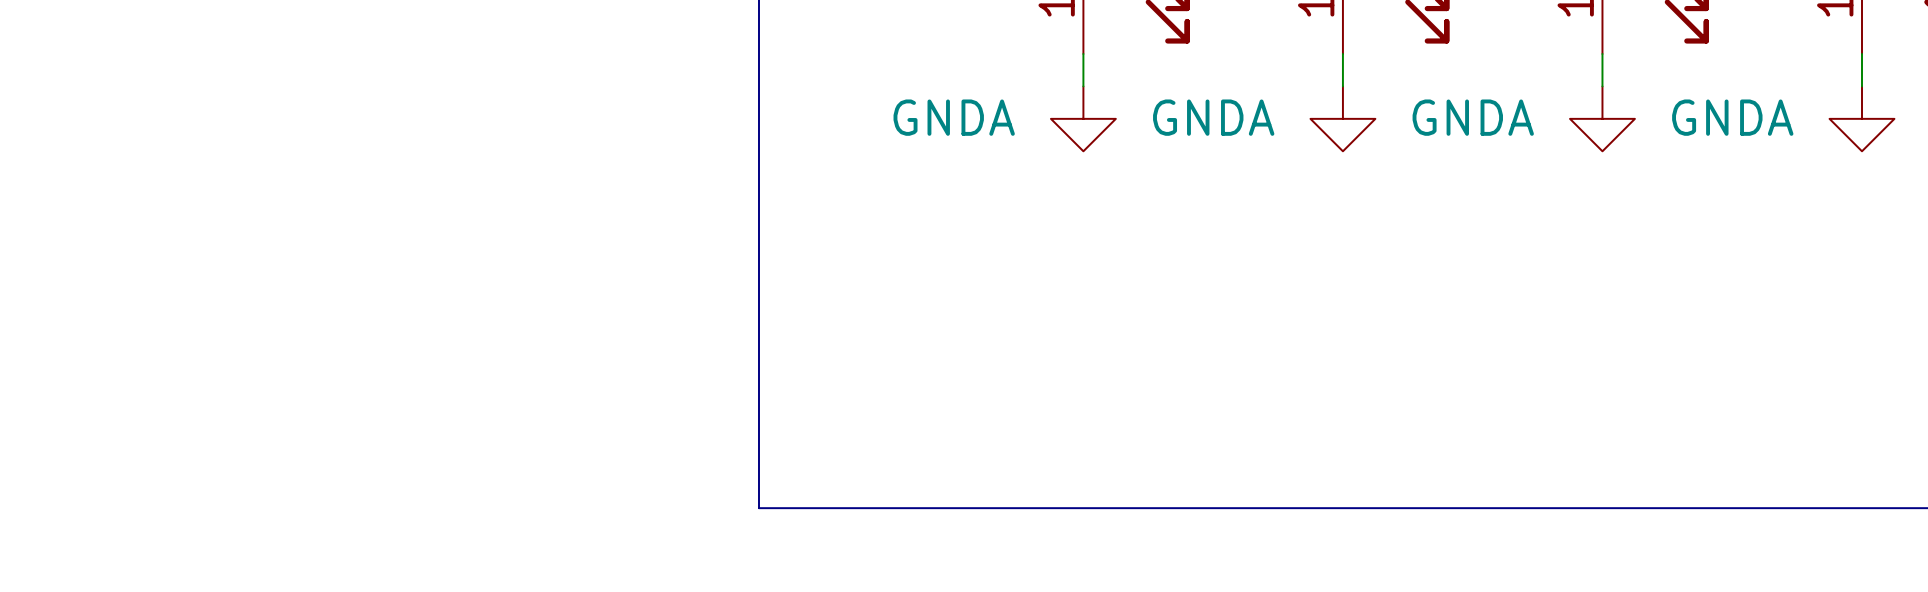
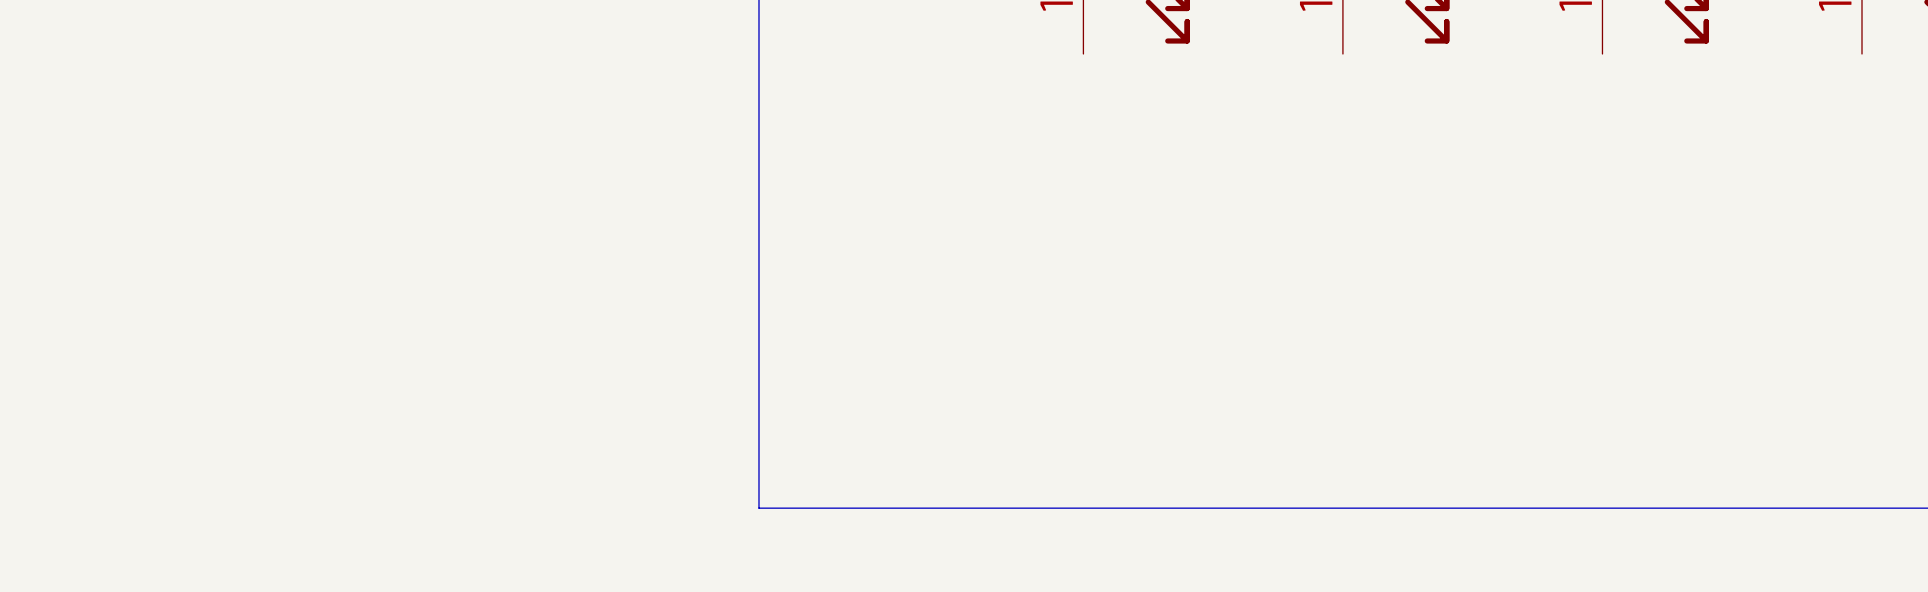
wire: (1083, 53) (1083, 86) -> none
wire: (1342, 53) (1342, 86) -> none
wire: (1602, 53) (1602, 86) -> none
wire: (1862, 53) (1862, 86) -> none
power symbol: GNDA (1083, 118) -> none
power symbol: GNDA (1342, 118) -> none
power symbol: GNDA (1602, 118) -> none
power symbol: GNDA (1862, 118) -> none

